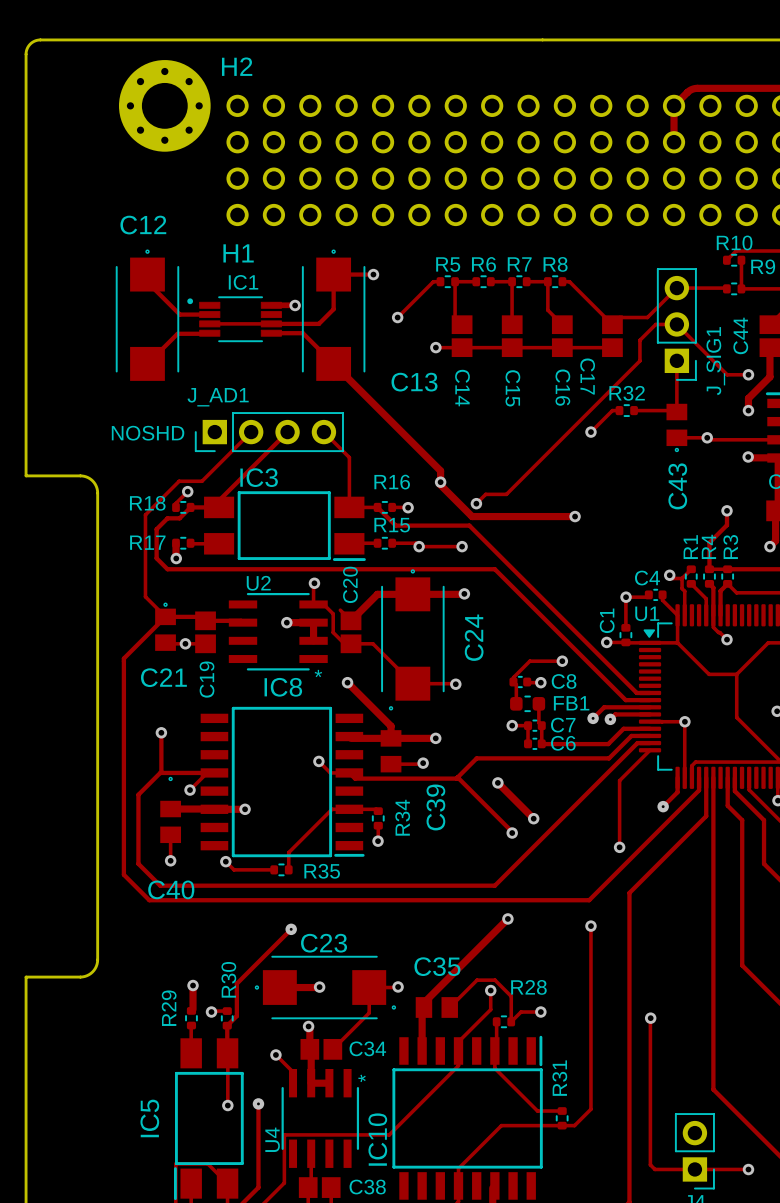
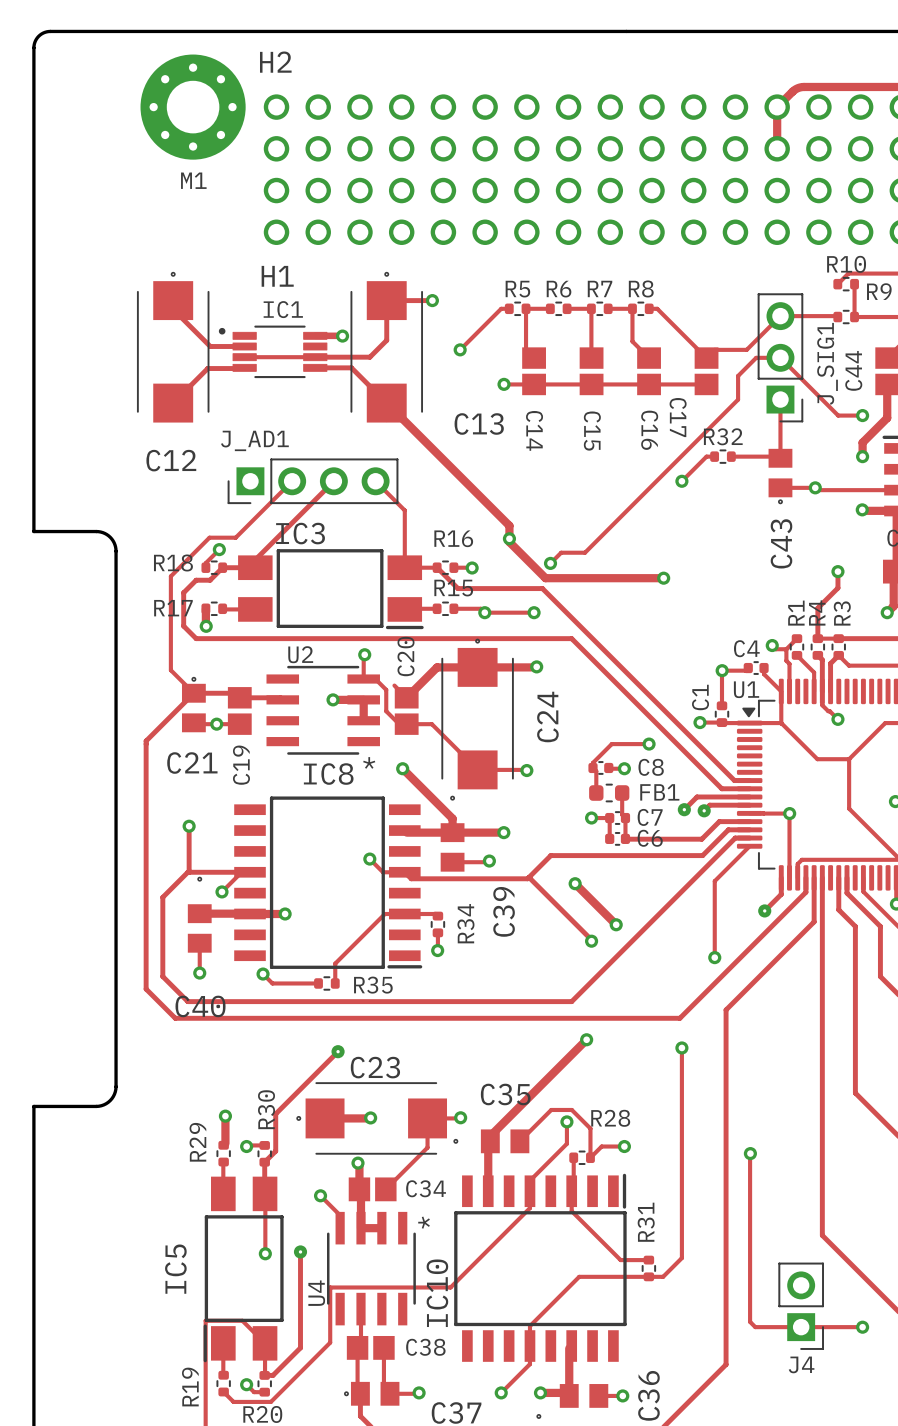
M1 name: none -> M1 (193, 180)
C12 name position: C12 (143, 225) -> C12 (171, 460)
J_SIG1 name position: J_SIG1 (715, 361) -> J_SIG1 (827, 363)
text: NOSHD (148, 433) -> none

